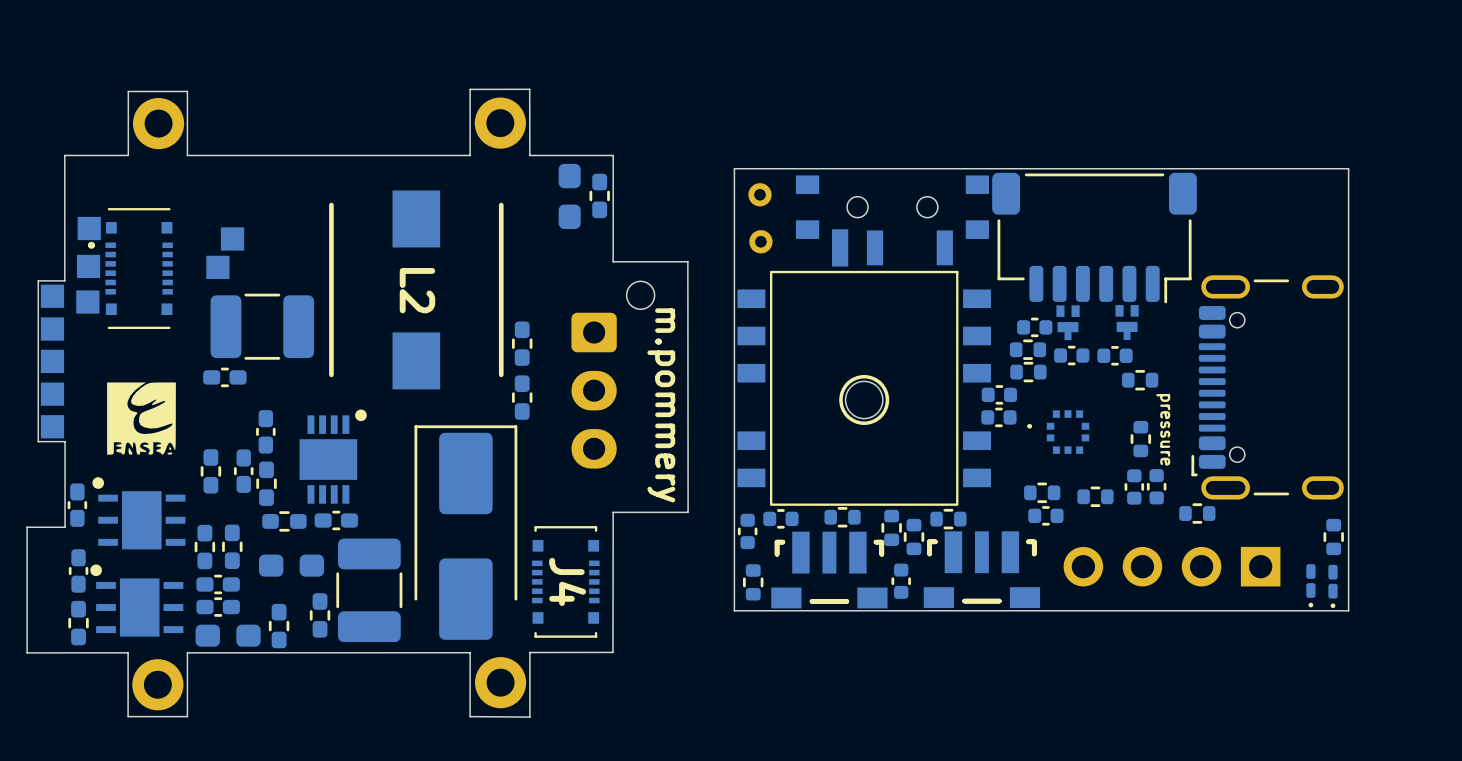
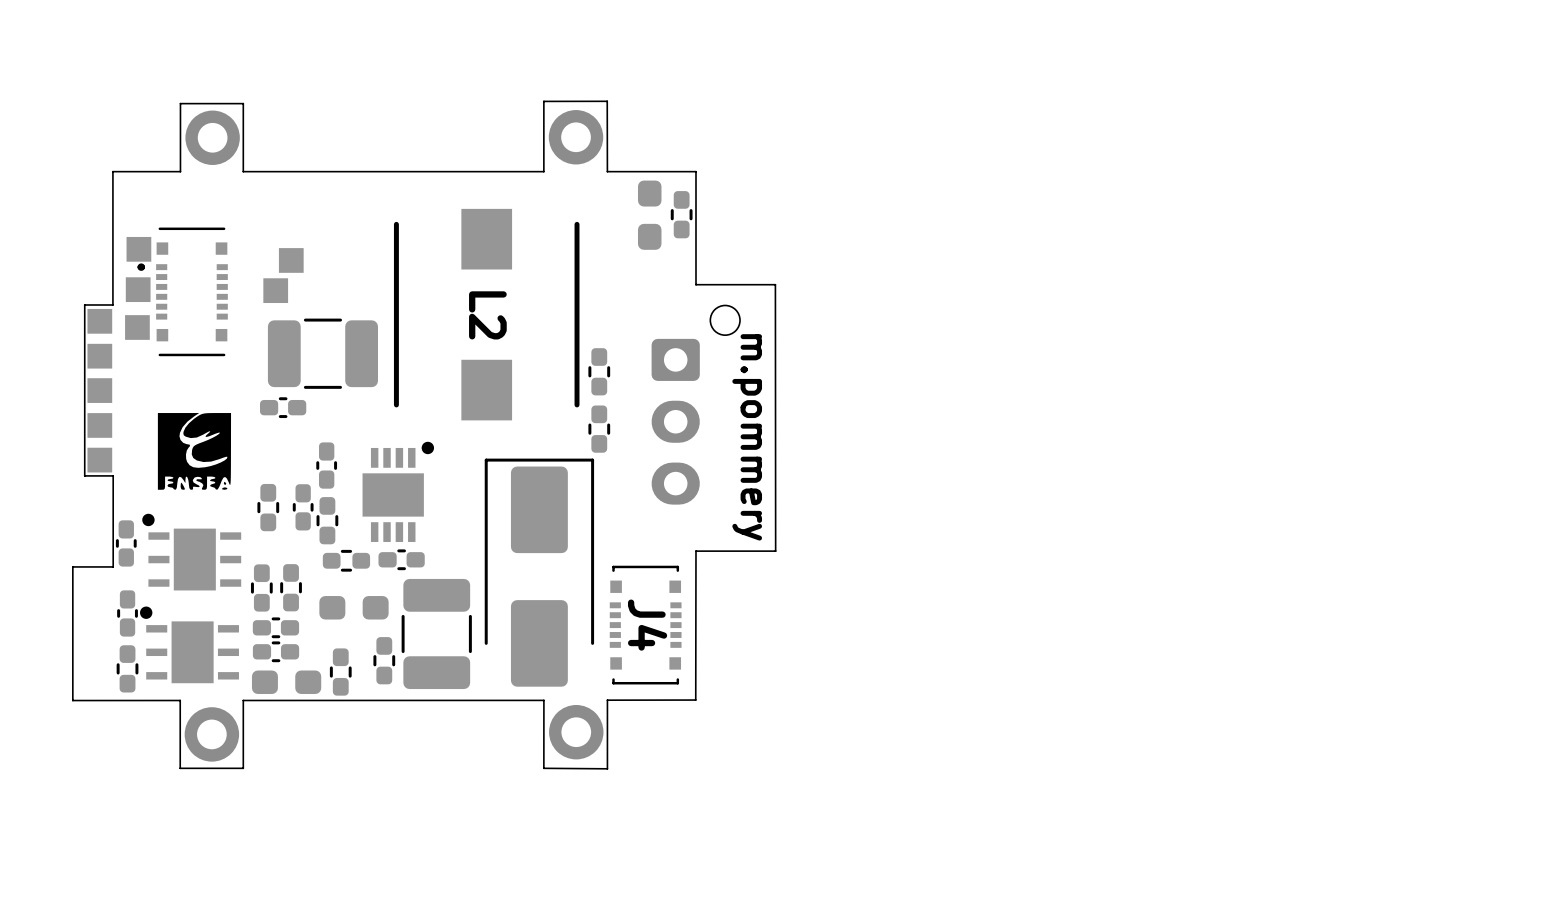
board edge: (1348, 168) (734, 168) (734, 610) (1348, 610) (1348, 168) -> none
part: (759, 194) -> none
part: (892, 220) -> none
part: (1094, 238) -> none
part: (760, 241) -> none
part: (1068, 322) -> none
part: (1127, 322) -> none
part: (1034, 327) -> none
part: (1028, 349) -> none
part: (1071, 355) -> none
part: (1115, 355) -> none
part: (1028, 372) -> none
part: (1140, 380) -> none
part: (1267, 387) -> none
part: (864, 388) -> none
part: (999, 394) -> none
part: (998, 417) -> none
text: pressure (1163, 429) -> none
part: (1058, 432) -> none
part: (1140, 439) -> none
part: (1134, 486) -> none
part: (1156, 486) -> none
part: (1042, 492) -> none
part: (1095, 496) -> none
part: (1197, 513) -> none
part: (1045, 515) -> none
part: (842, 517) -> none
part: (780, 518) -> none
part: (948, 519) -> none
part: (891, 527) -> none
part: (747, 531) -> none
part: (914, 537) -> none
part: (1333, 537) -> none
part: (1172, 566) -> none
part: (981, 569) -> none
part: (829, 570) -> none
part: (901, 581) -> none
part: (753, 582) -> none
part: (1310, 585) -> none
part: (1333, 586) -> none

